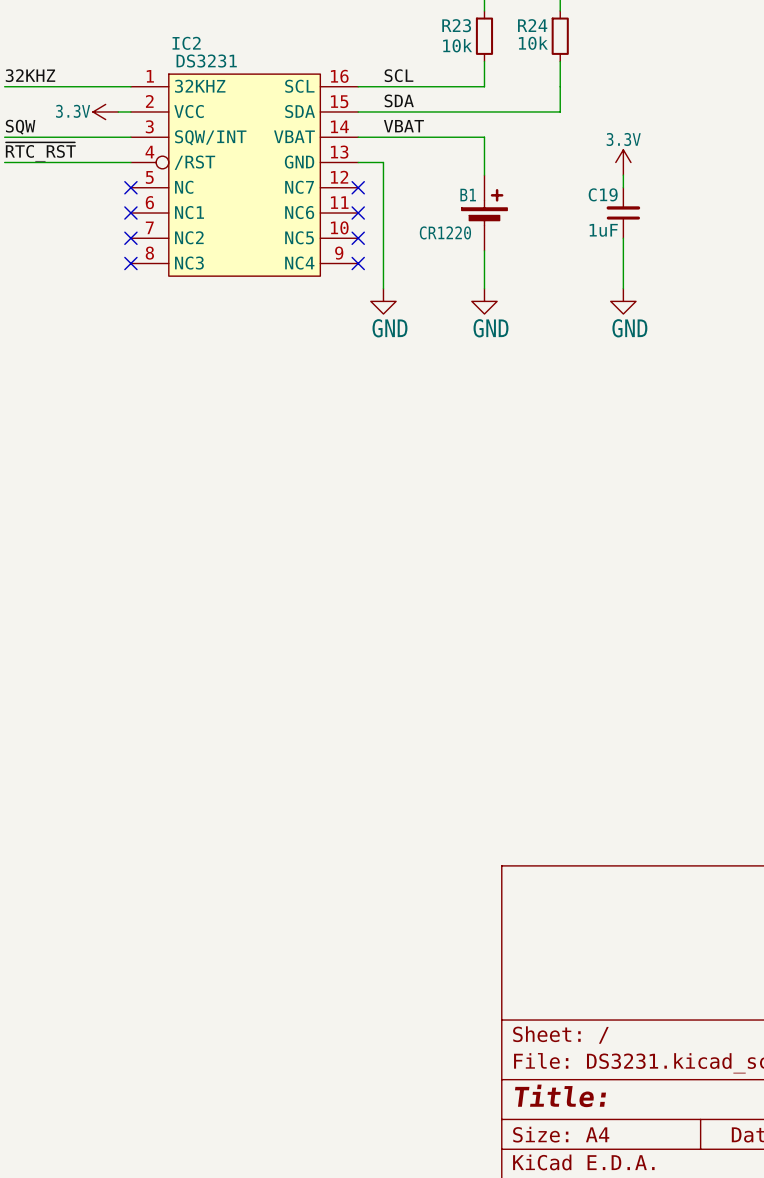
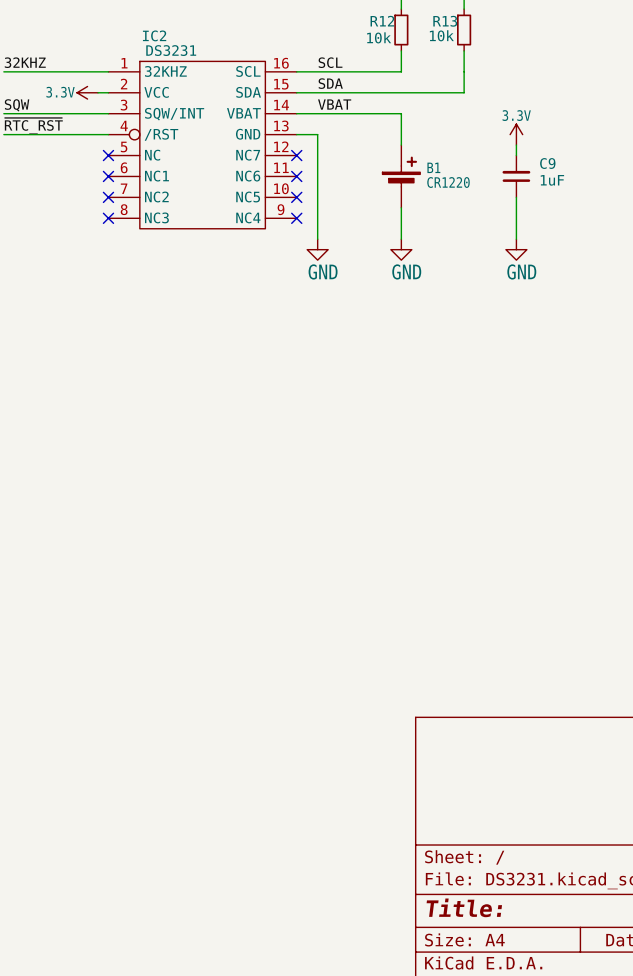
R23 name: R23 (456, 25) -> R12 (382, 21)
R24 name: R24 (532, 25) -> R13 (445, 21)
IC2 symbol: [130, 74, 359, 277] -> [108, 61, 297, 229]
C19 name: C19 (603, 194) -> C9 (547, 163)
B1 name position: B1 (468, 195) -> B1 (433, 167)
C19 value position: 1uF (603, 230) -> 1uF (552, 180)
B1 value position: CR1220 (445, 232) -> CR1220 (448, 182)

